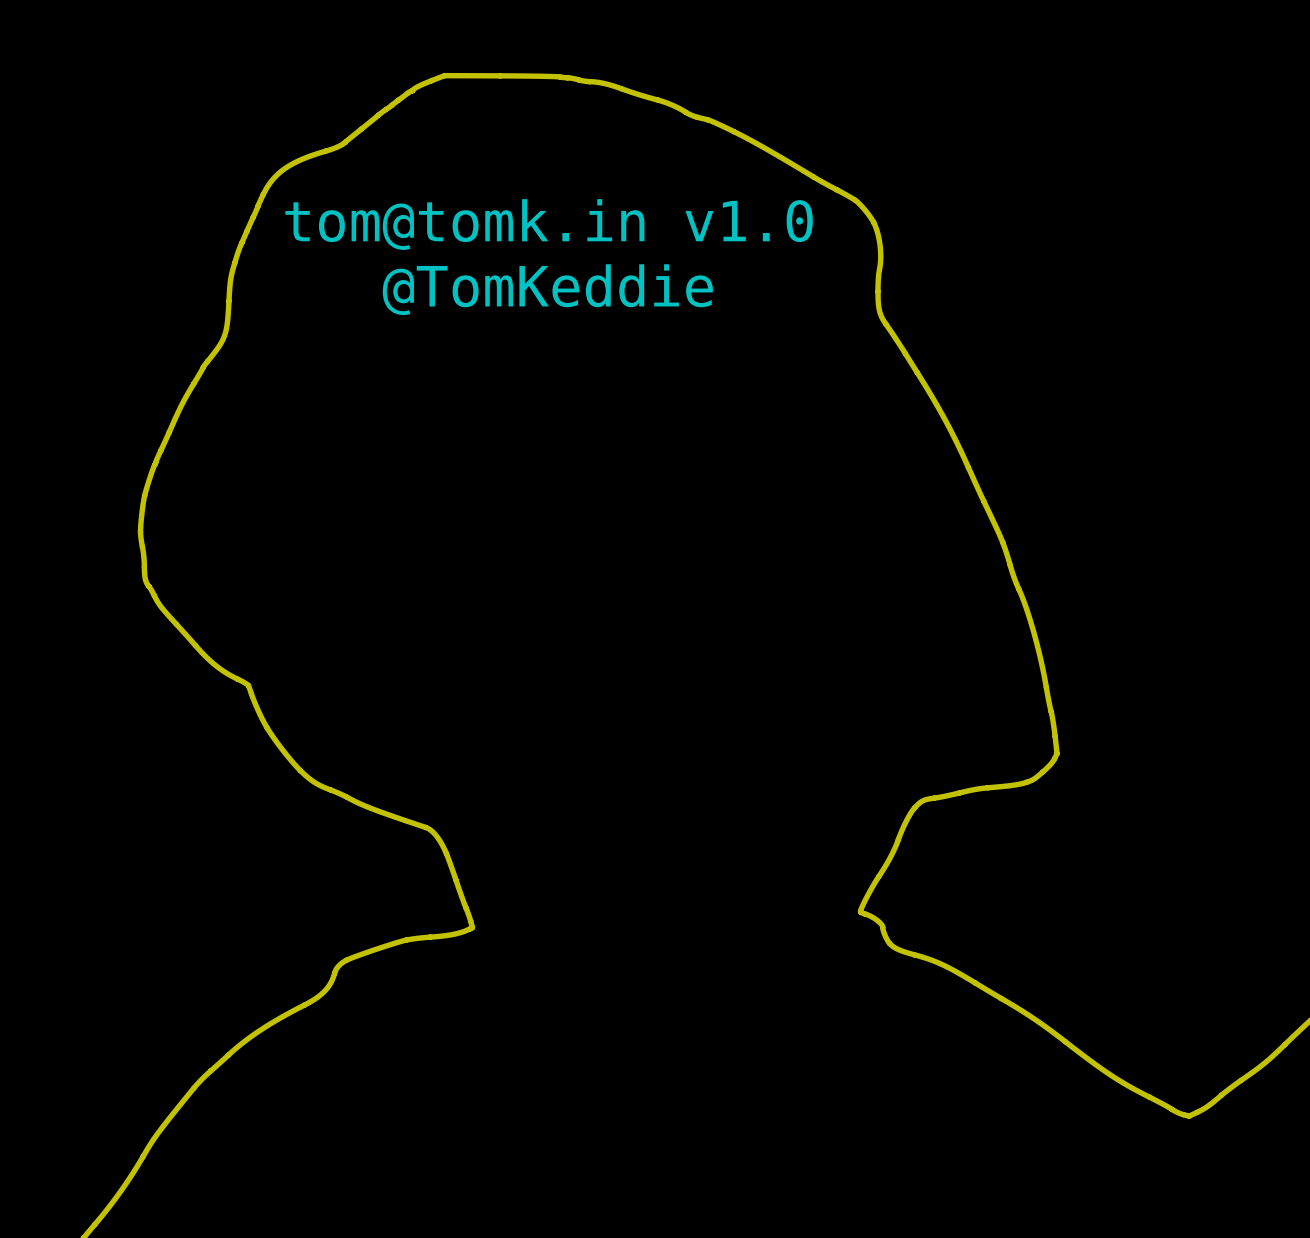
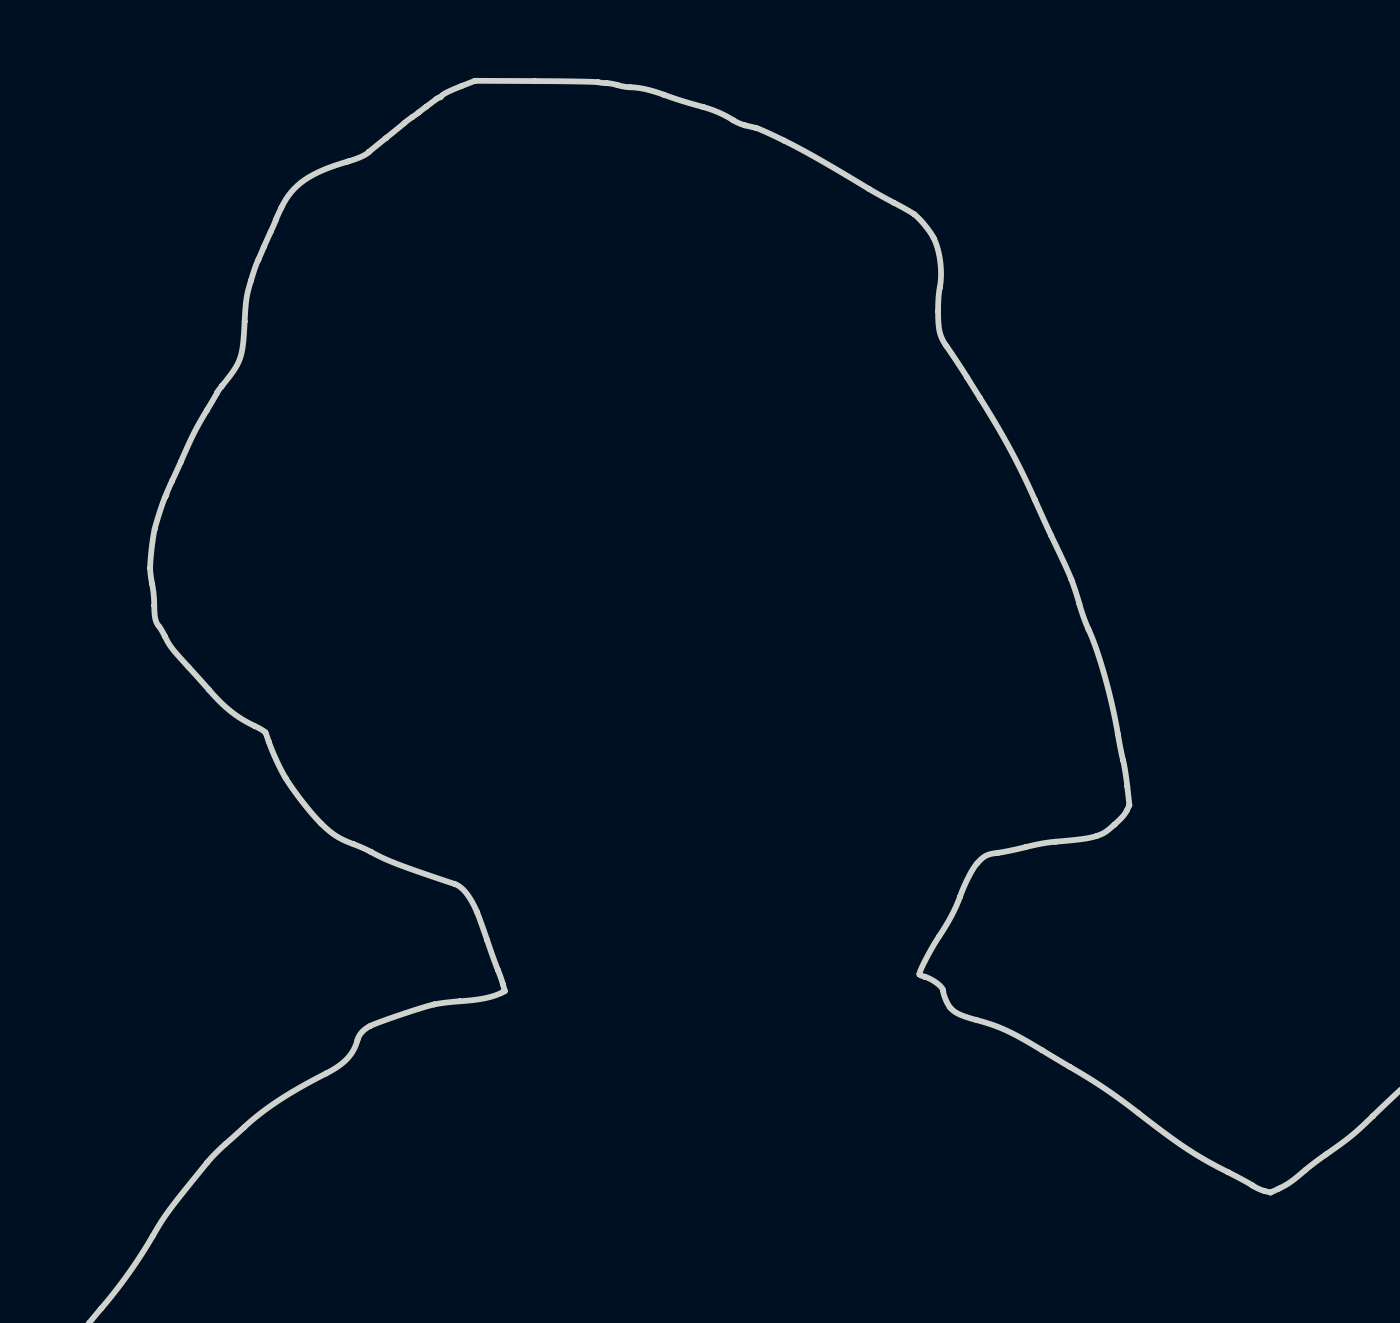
text: tom@tomk.in v1.0 (549, 224) -> none
text: @TomKeddie (547, 289) -> none

